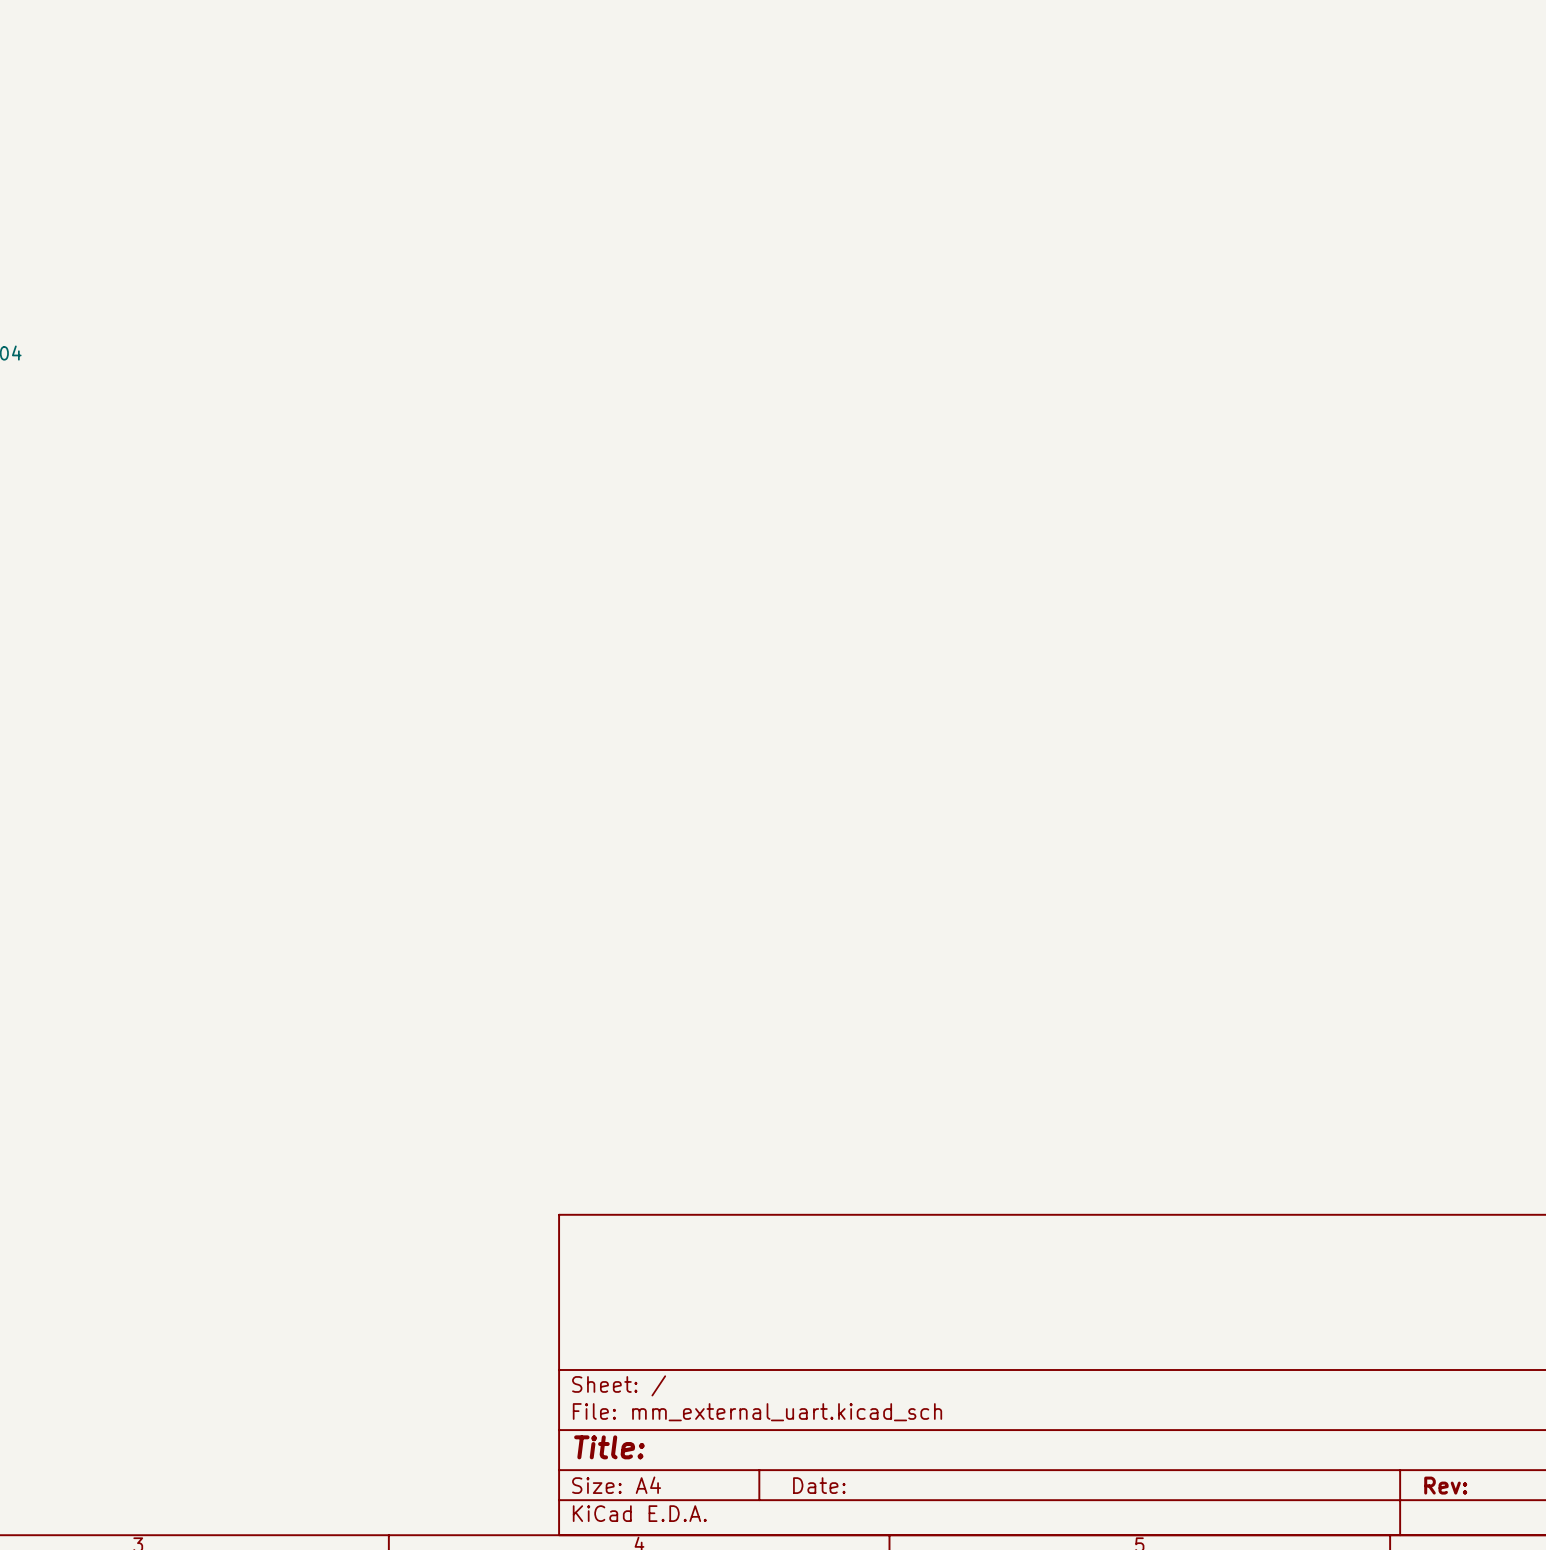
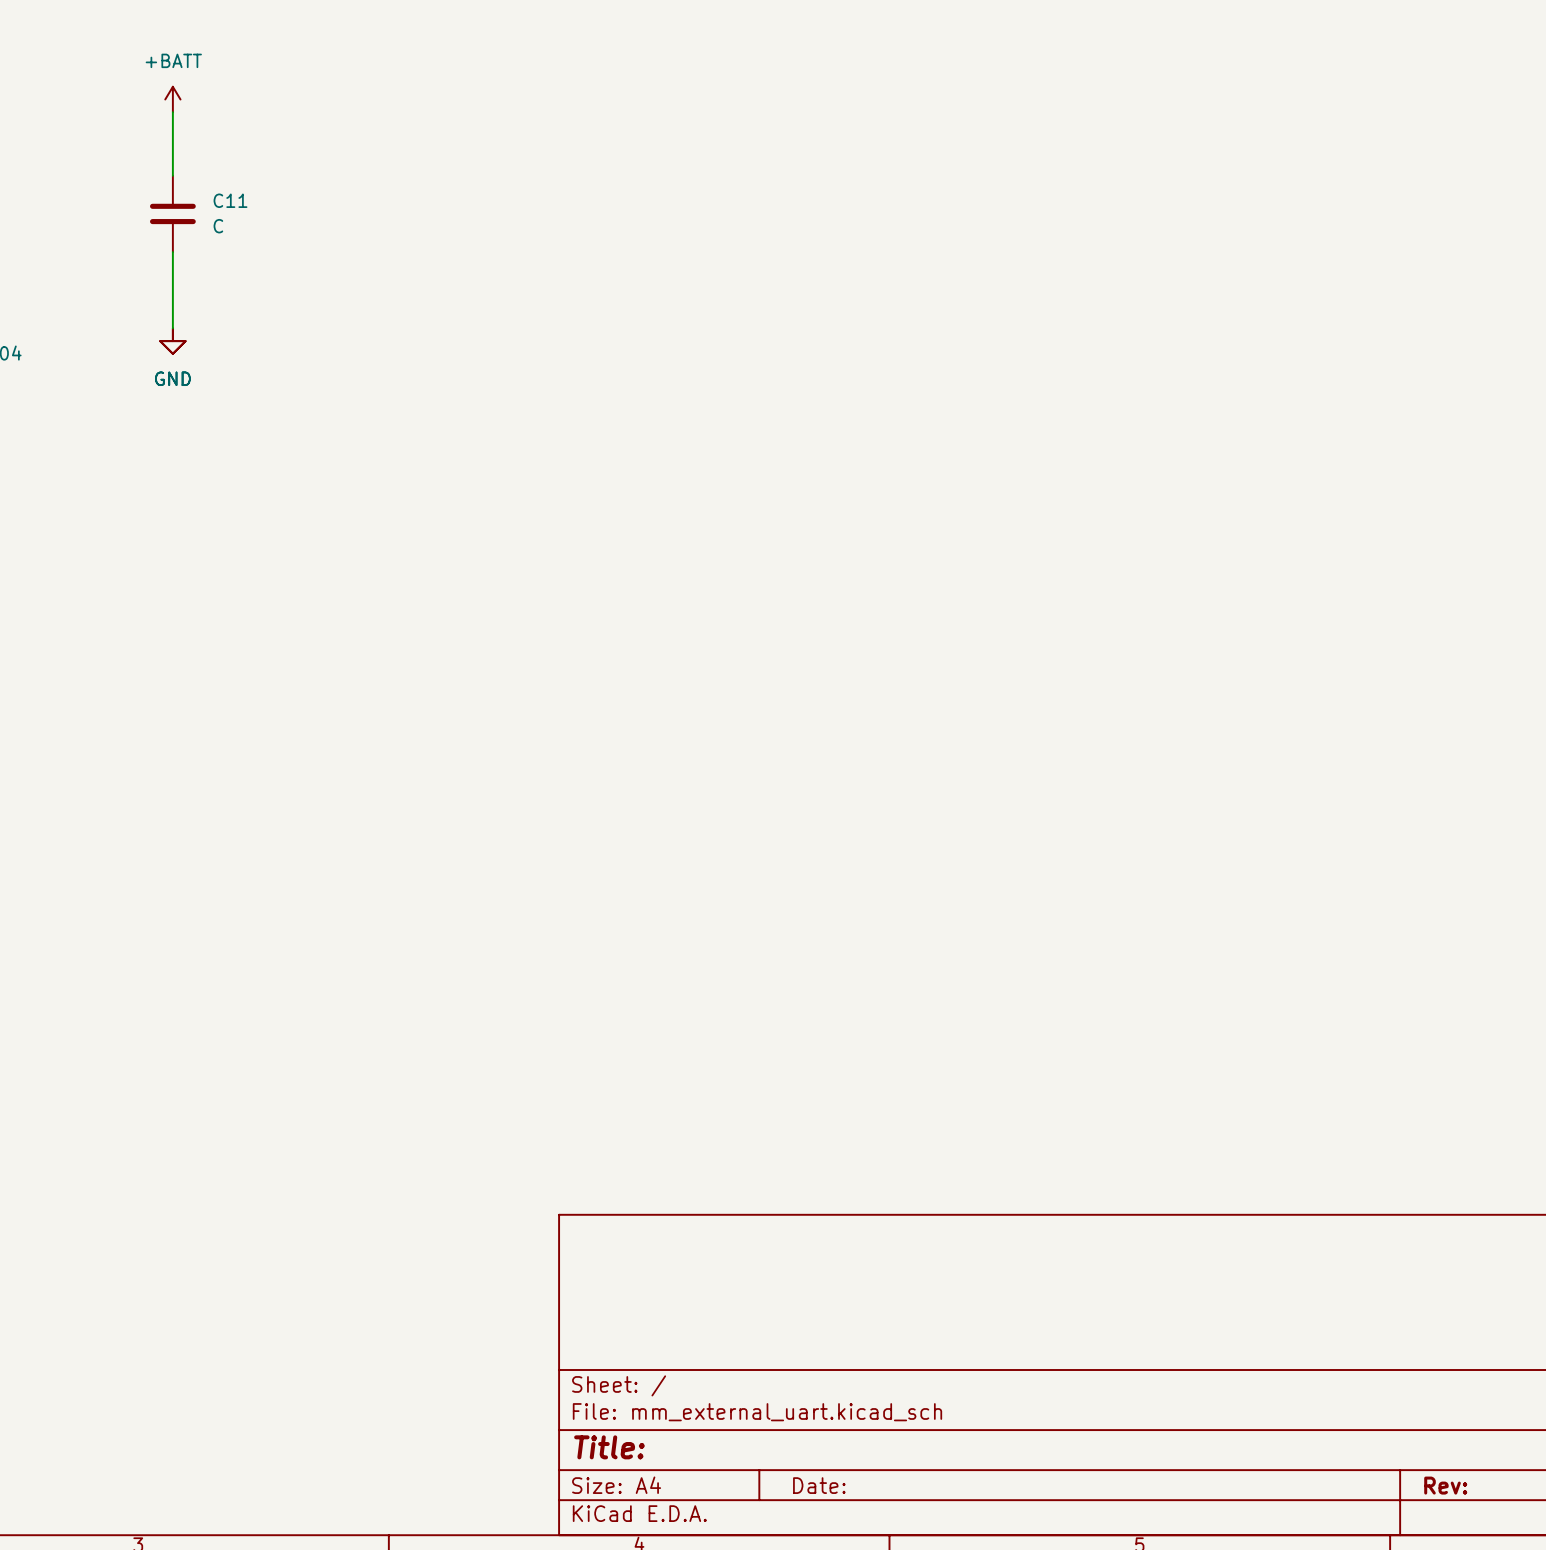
power symbol: none -> +BATT (172, 99)
wire: none -> (172, 112) (172, 175)
C11: none -> C (172, 213)
wire: none -> (172, 252) (172, 328)
power symbol: none -> GND (172, 341)

